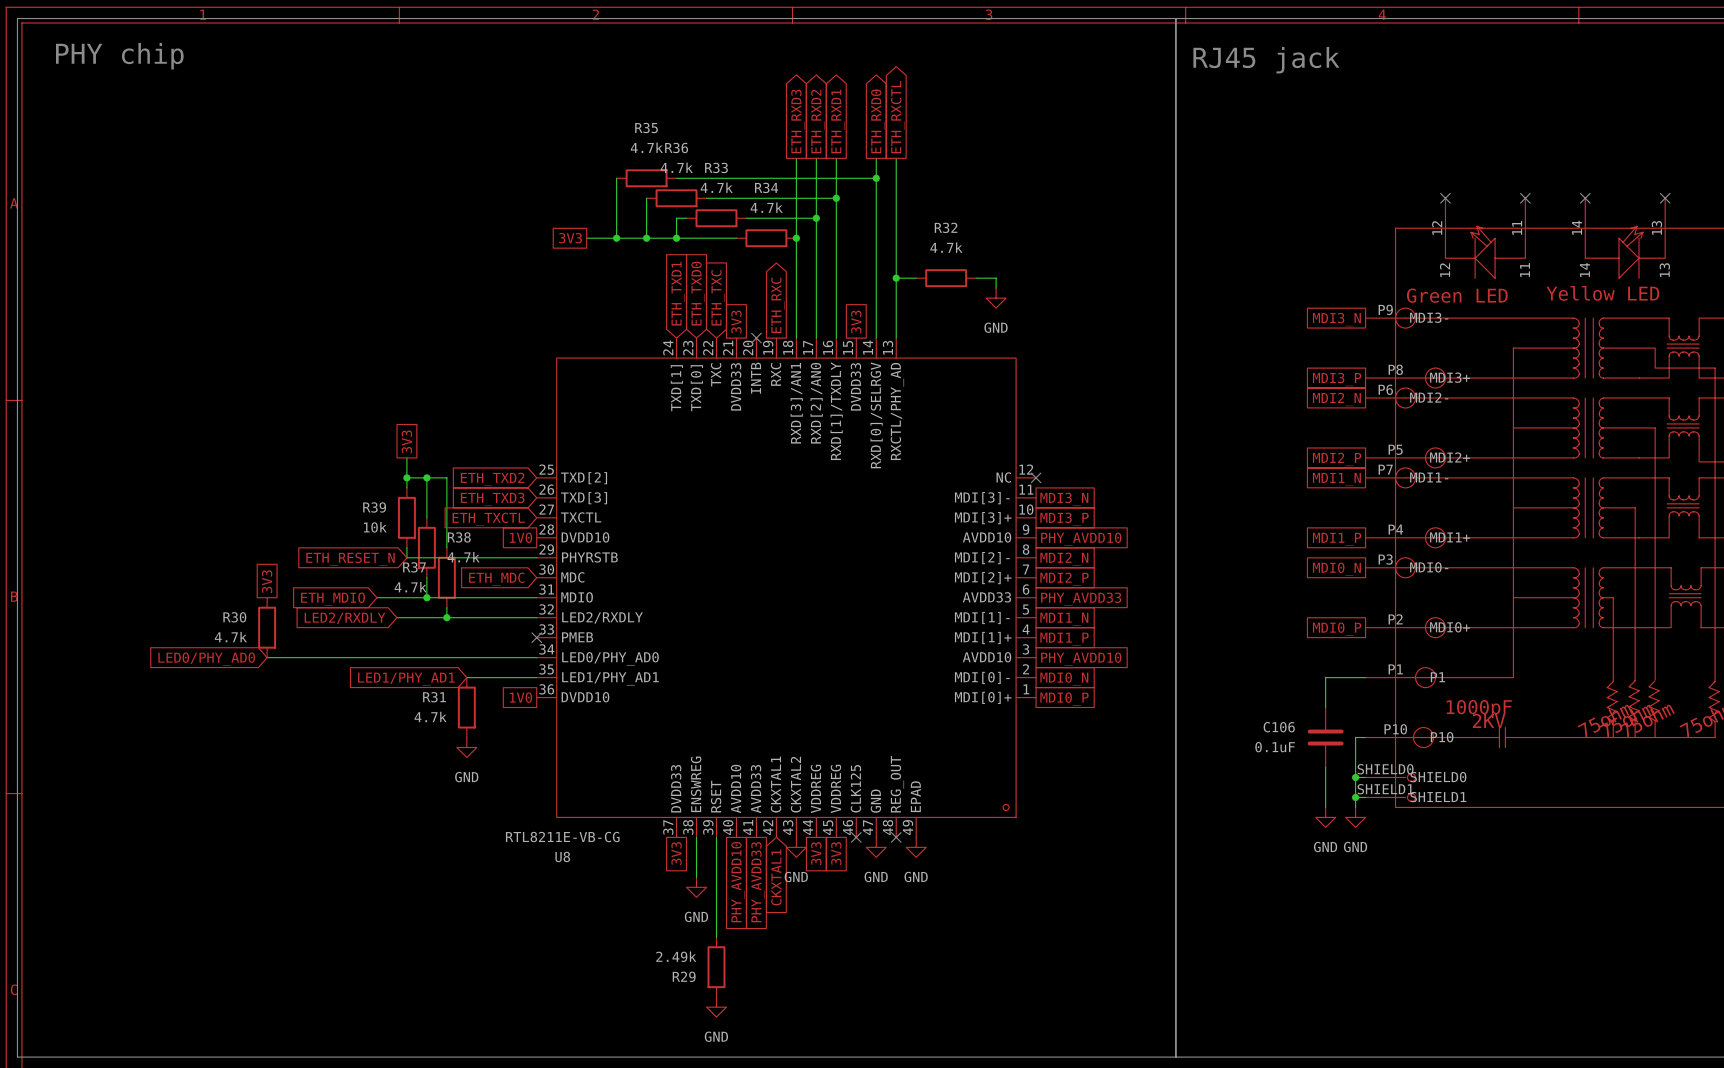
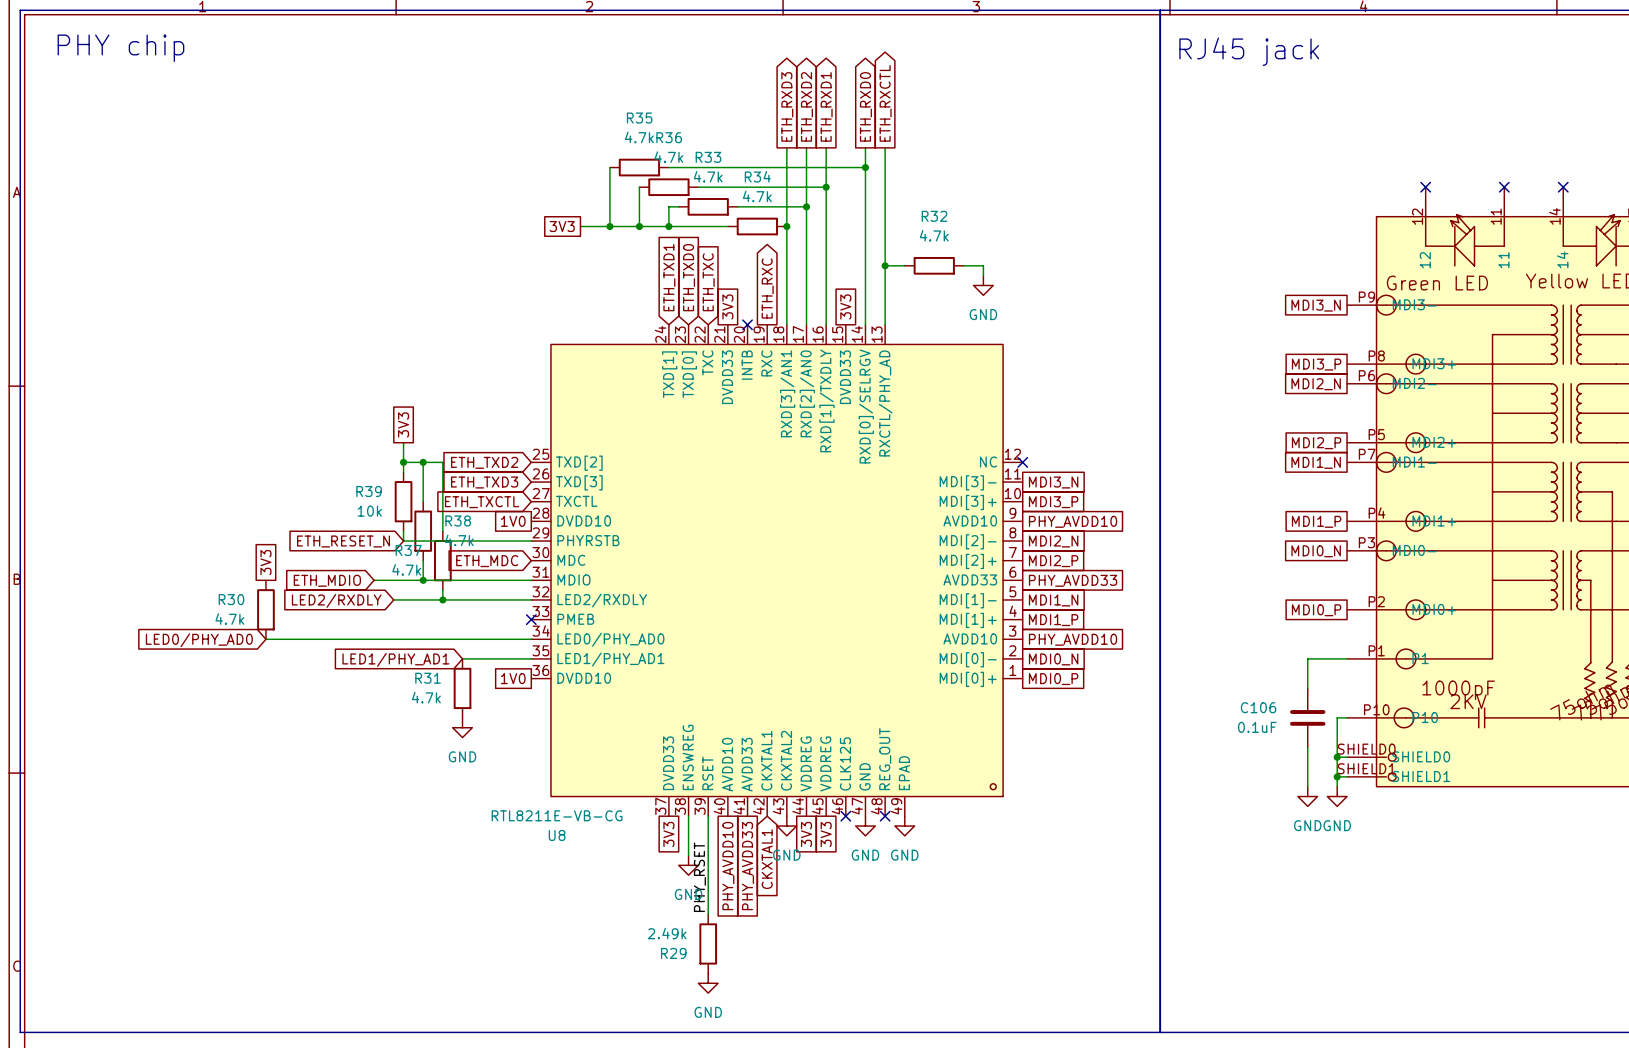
label: none -> PHY_RSET (699, 877)

